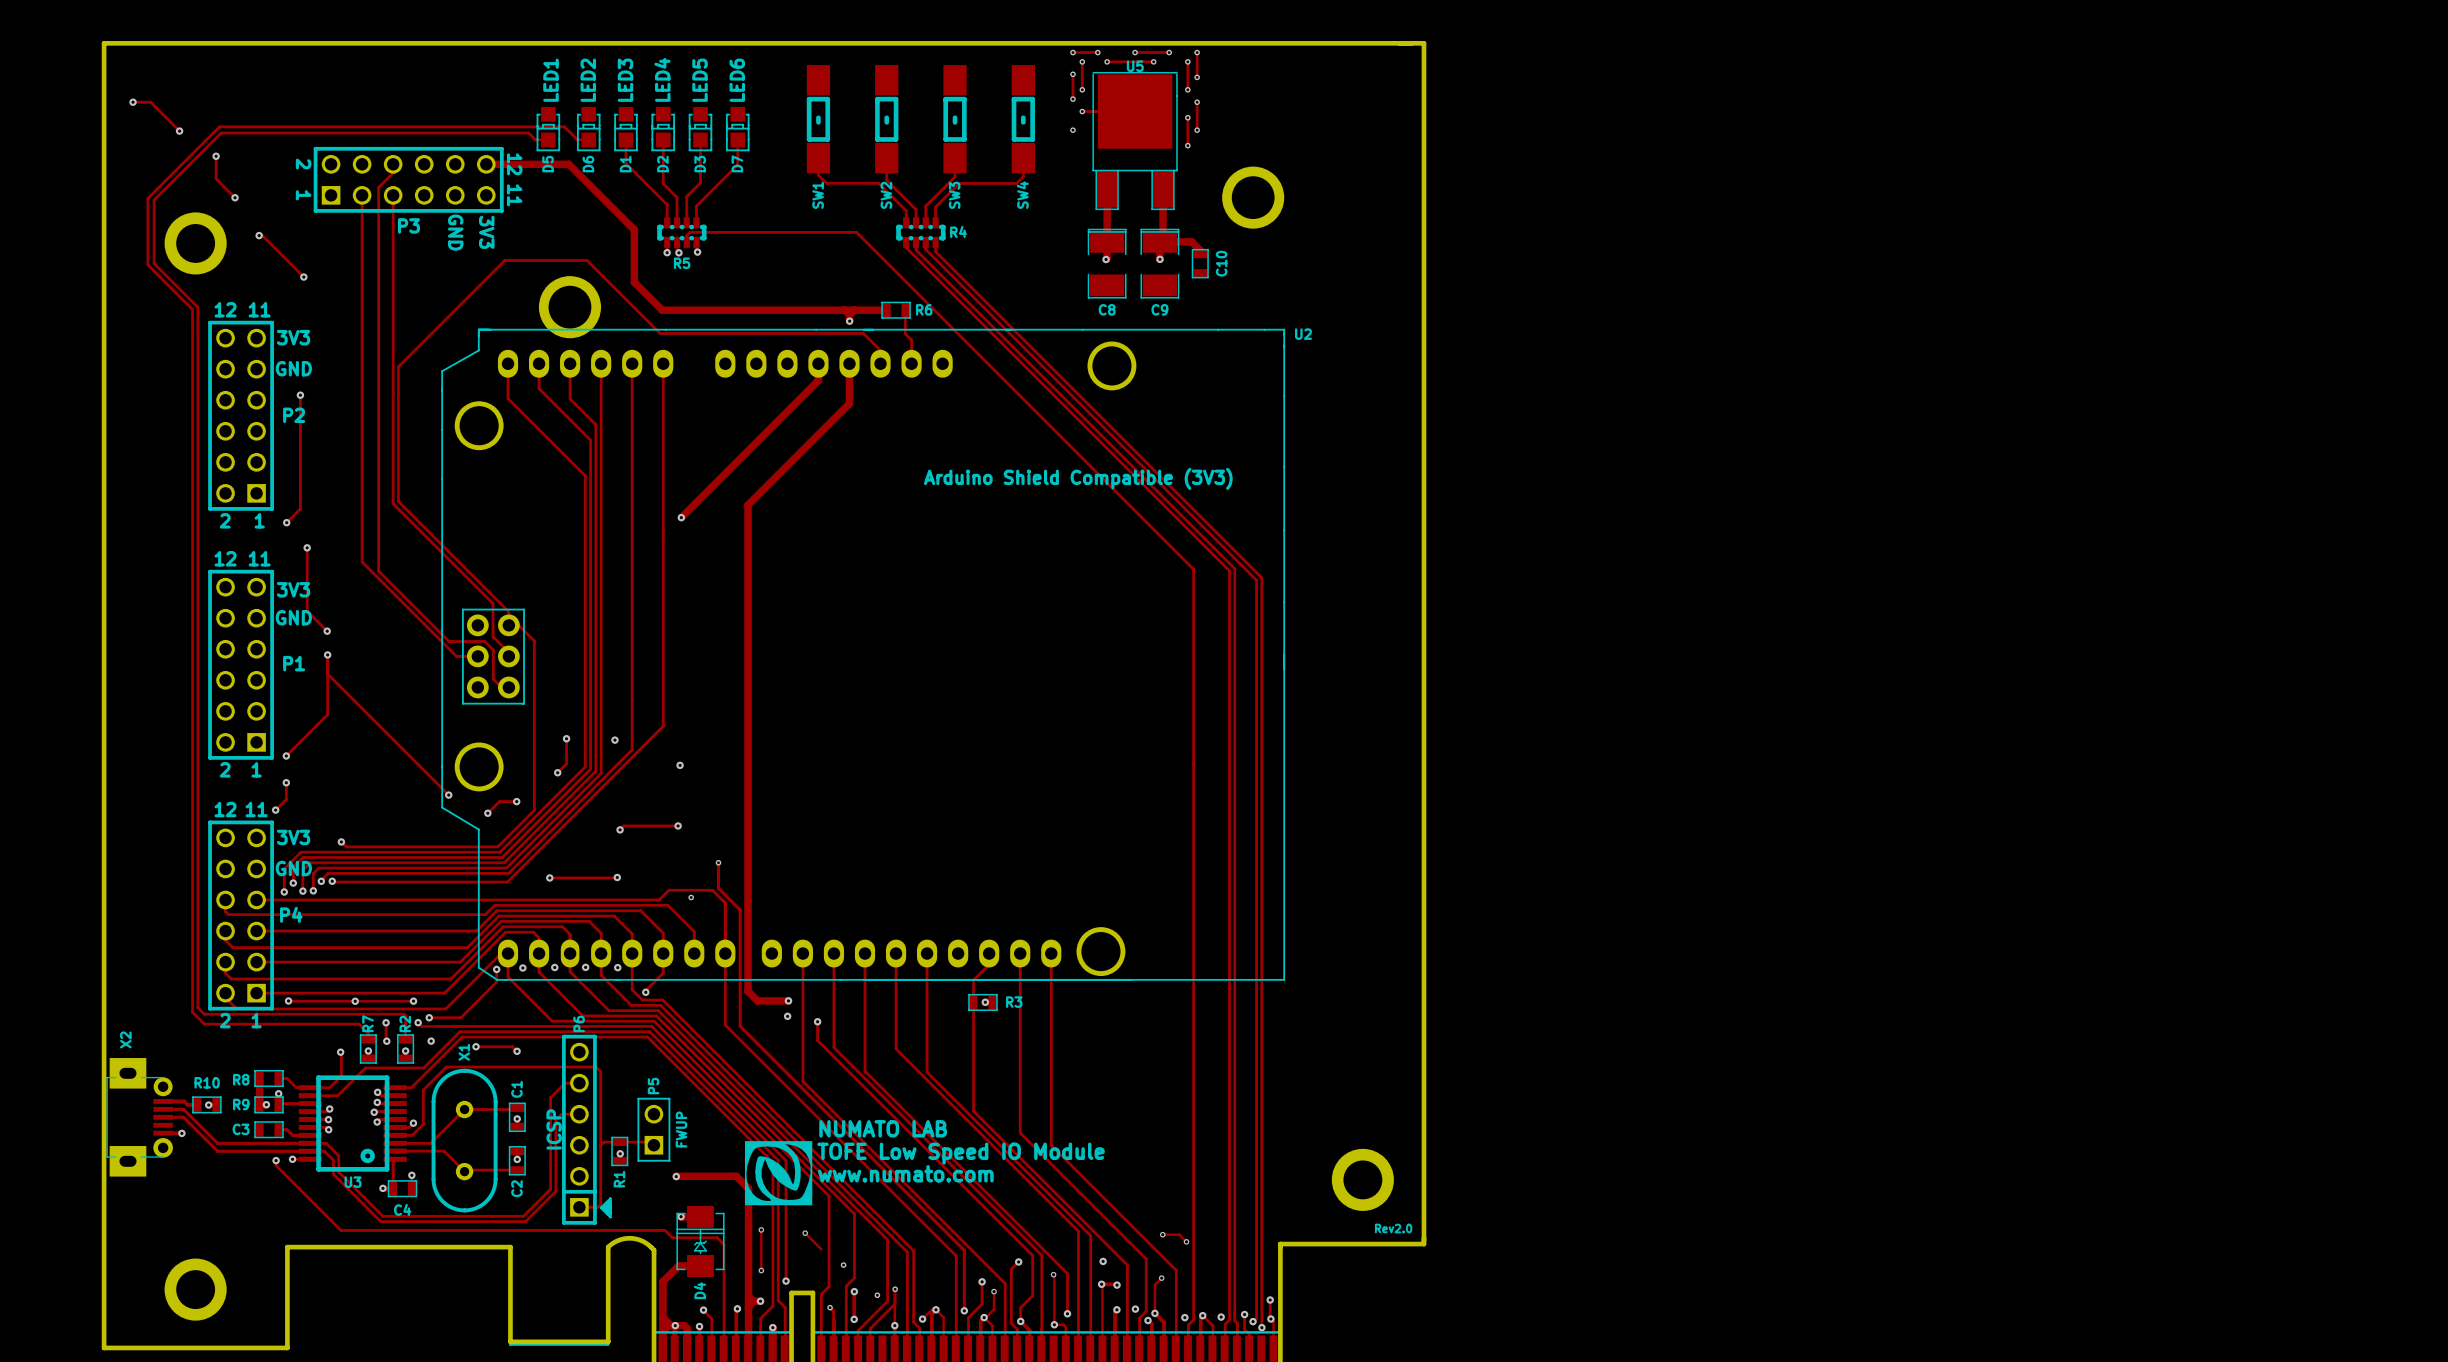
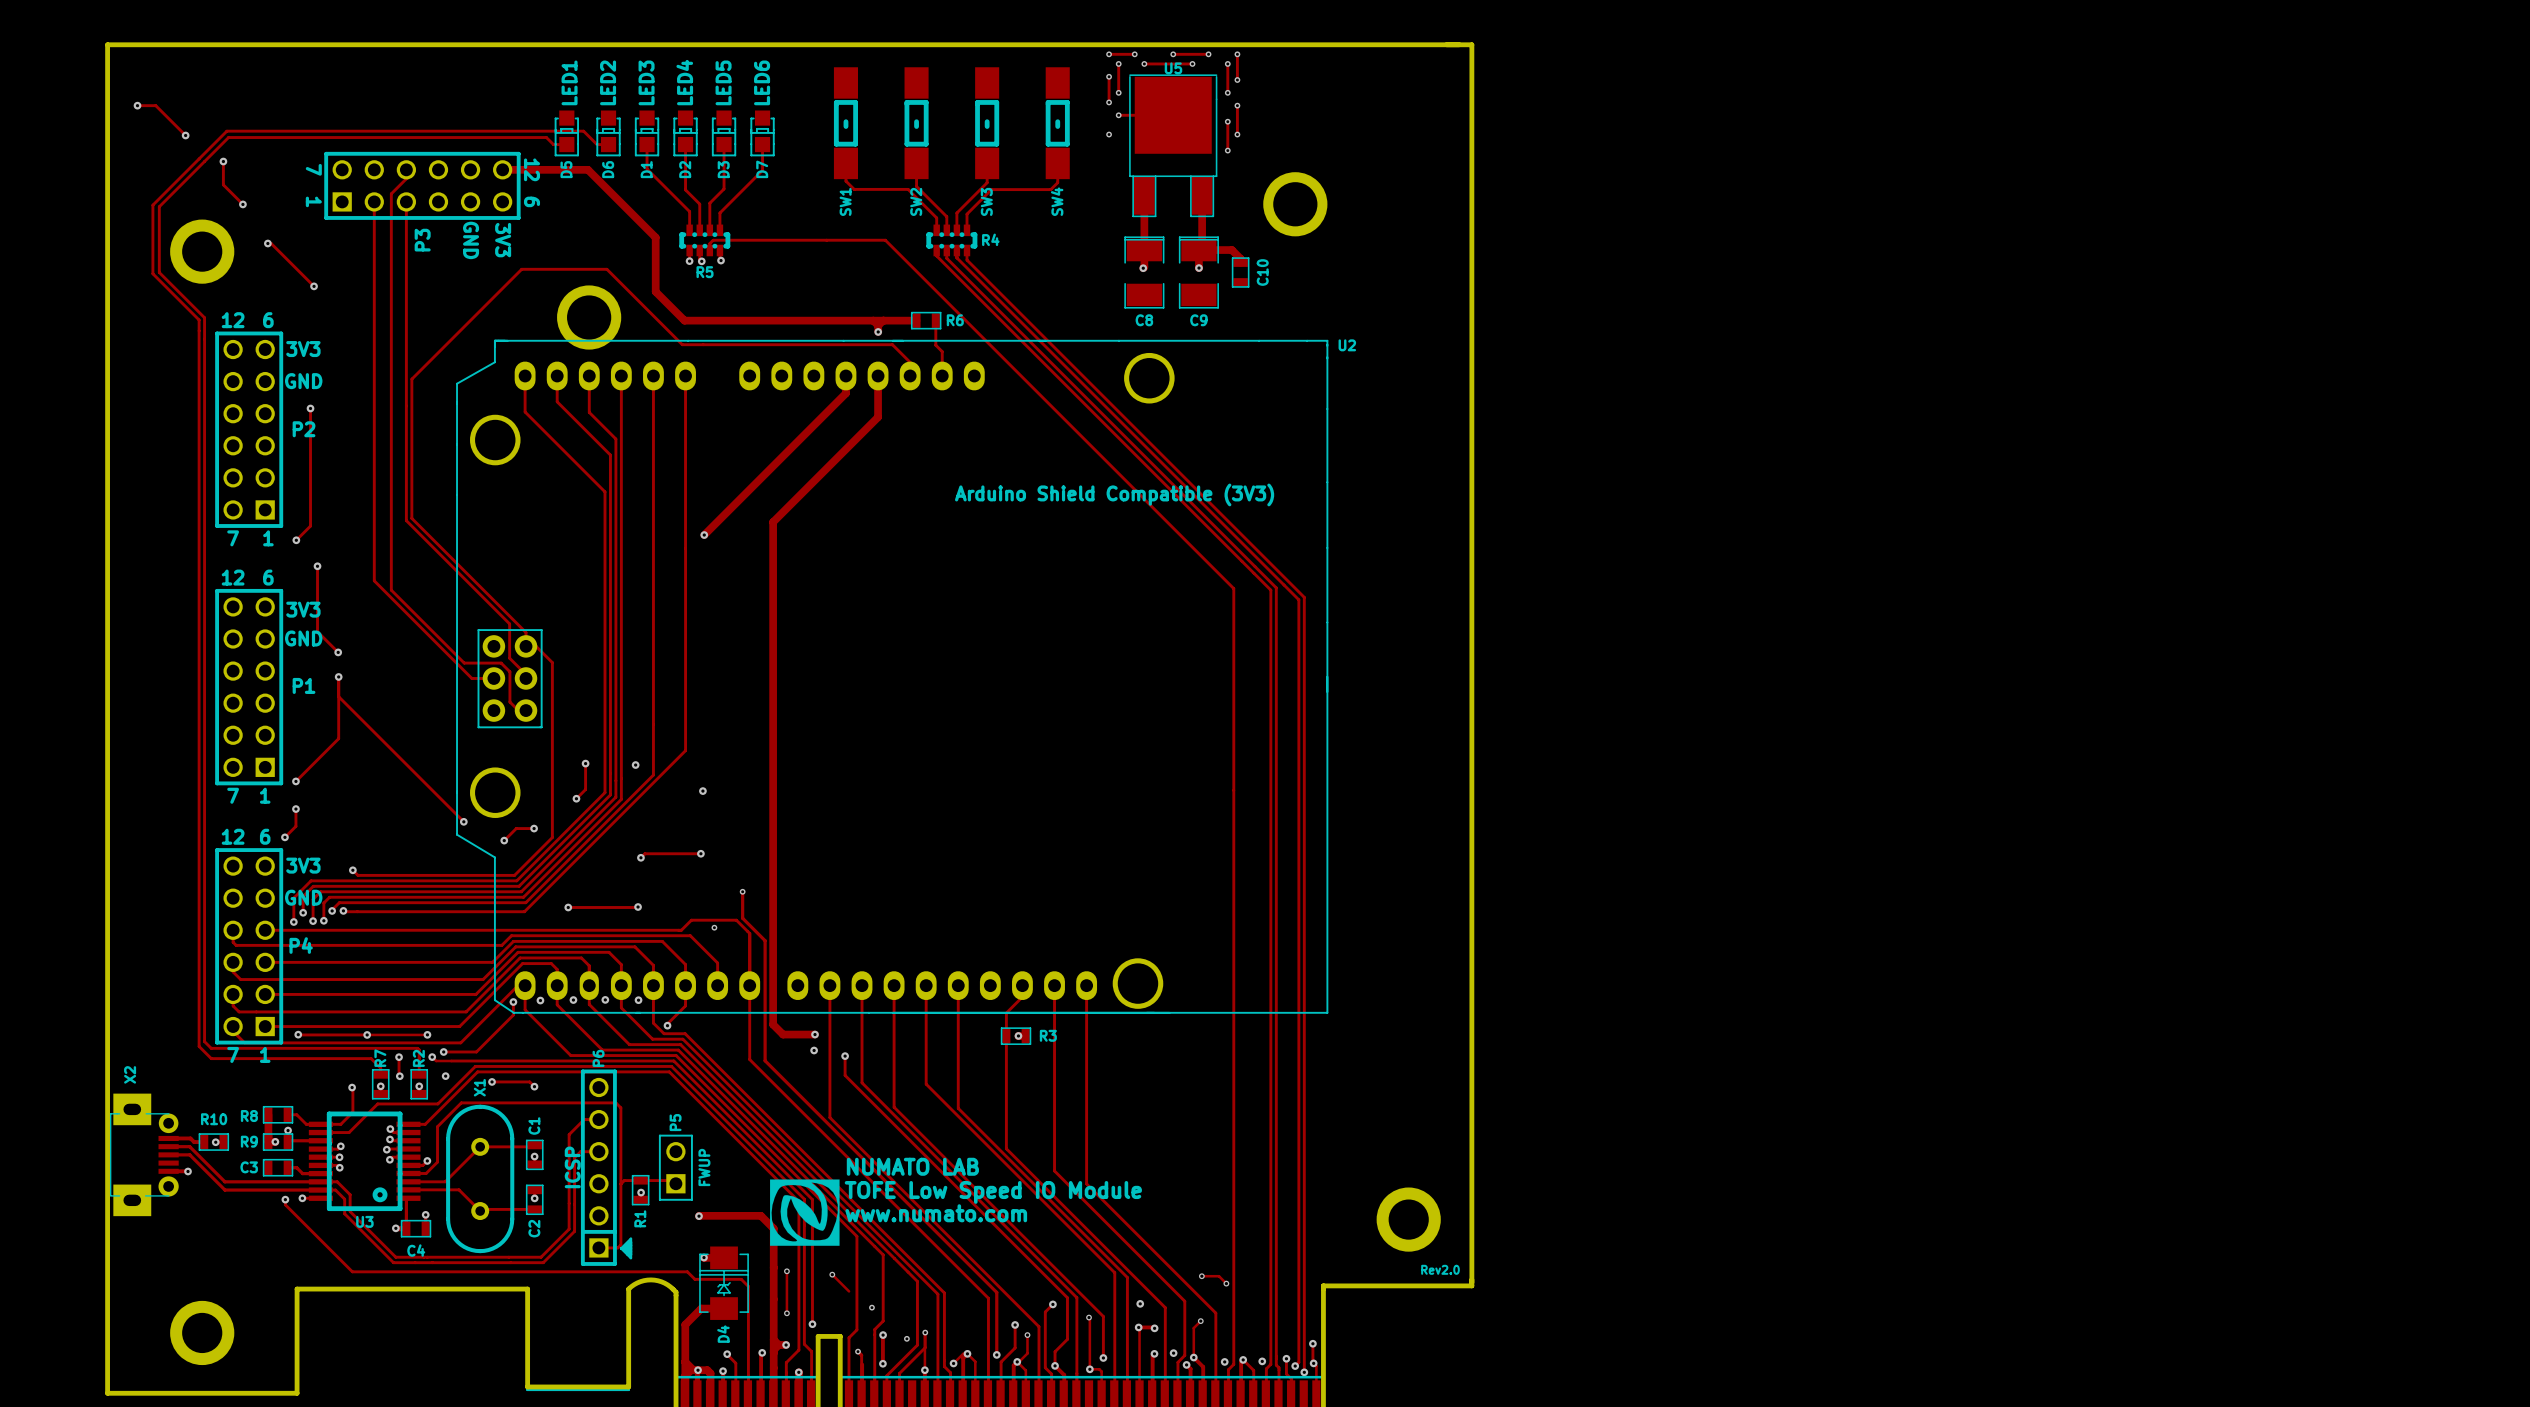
text: 2 (303, 164) -> 7 (313, 169)
text: 11 (514, 195) -> 6 (532, 201)
P3 name rotation: 0° (408, 225) -> 90° counterclockwise (422, 240)
text: 11 (259, 309) -> 6 (268, 320)
text: 2 (225, 520) -> 7 (233, 538)
text: 11 (259, 558) -> 6 (268, 577)
text: 2 (225, 769) -> 7 (233, 795)
text: 11 (256, 809) -> 6 (265, 836)
text: 2 (225, 1020) -> 7 (233, 1054)

